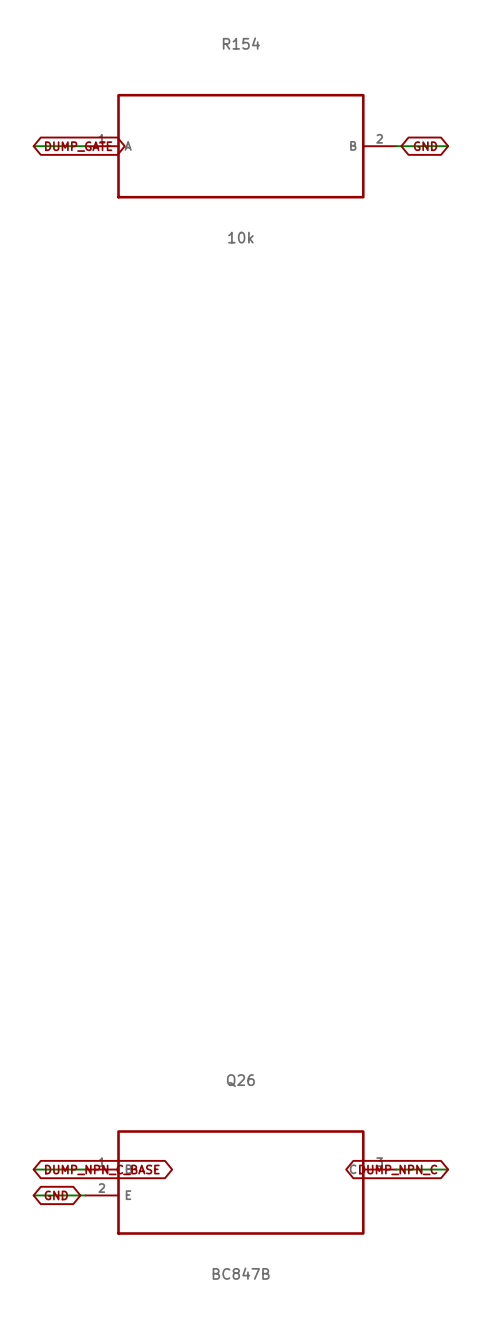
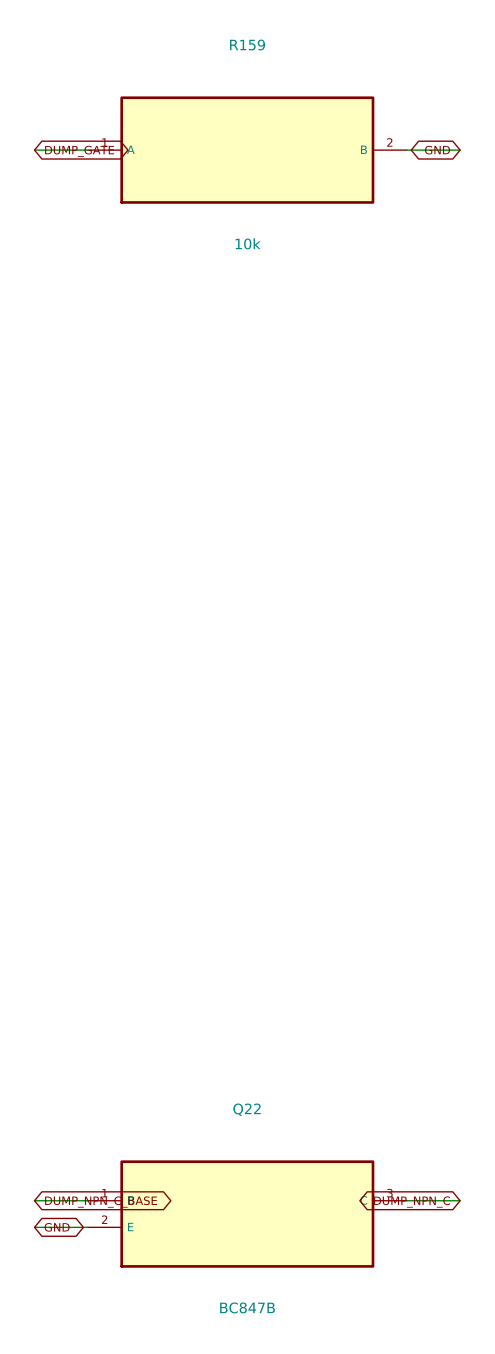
R154 name: R154 (241, 43) -> R159 (247, 45)
Q26 name: Q26 (240, 1080) -> Q22 (247, 1109)

